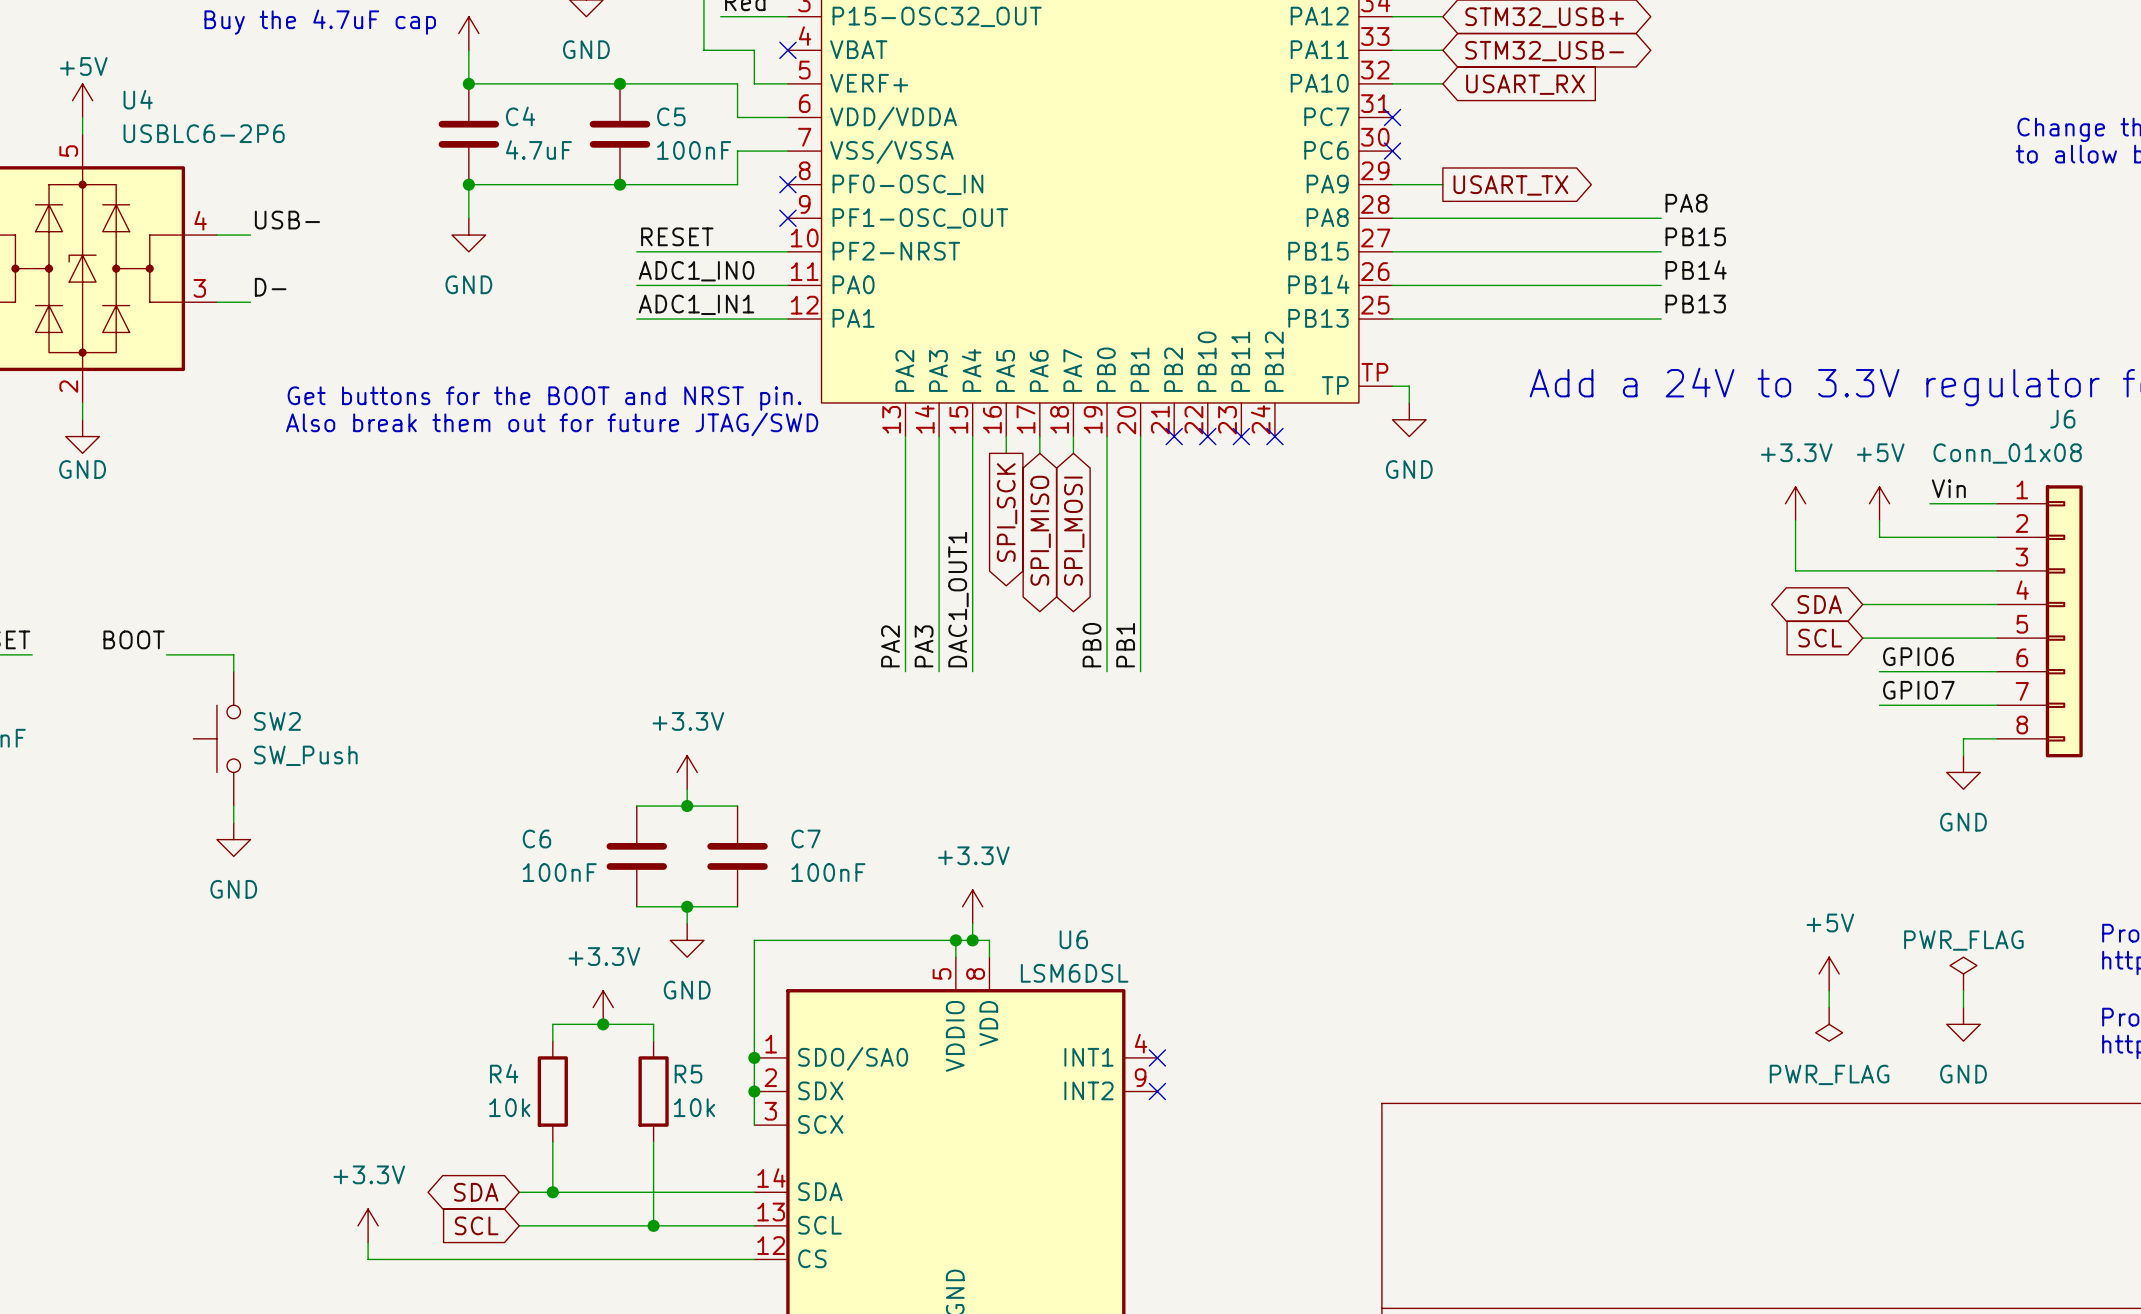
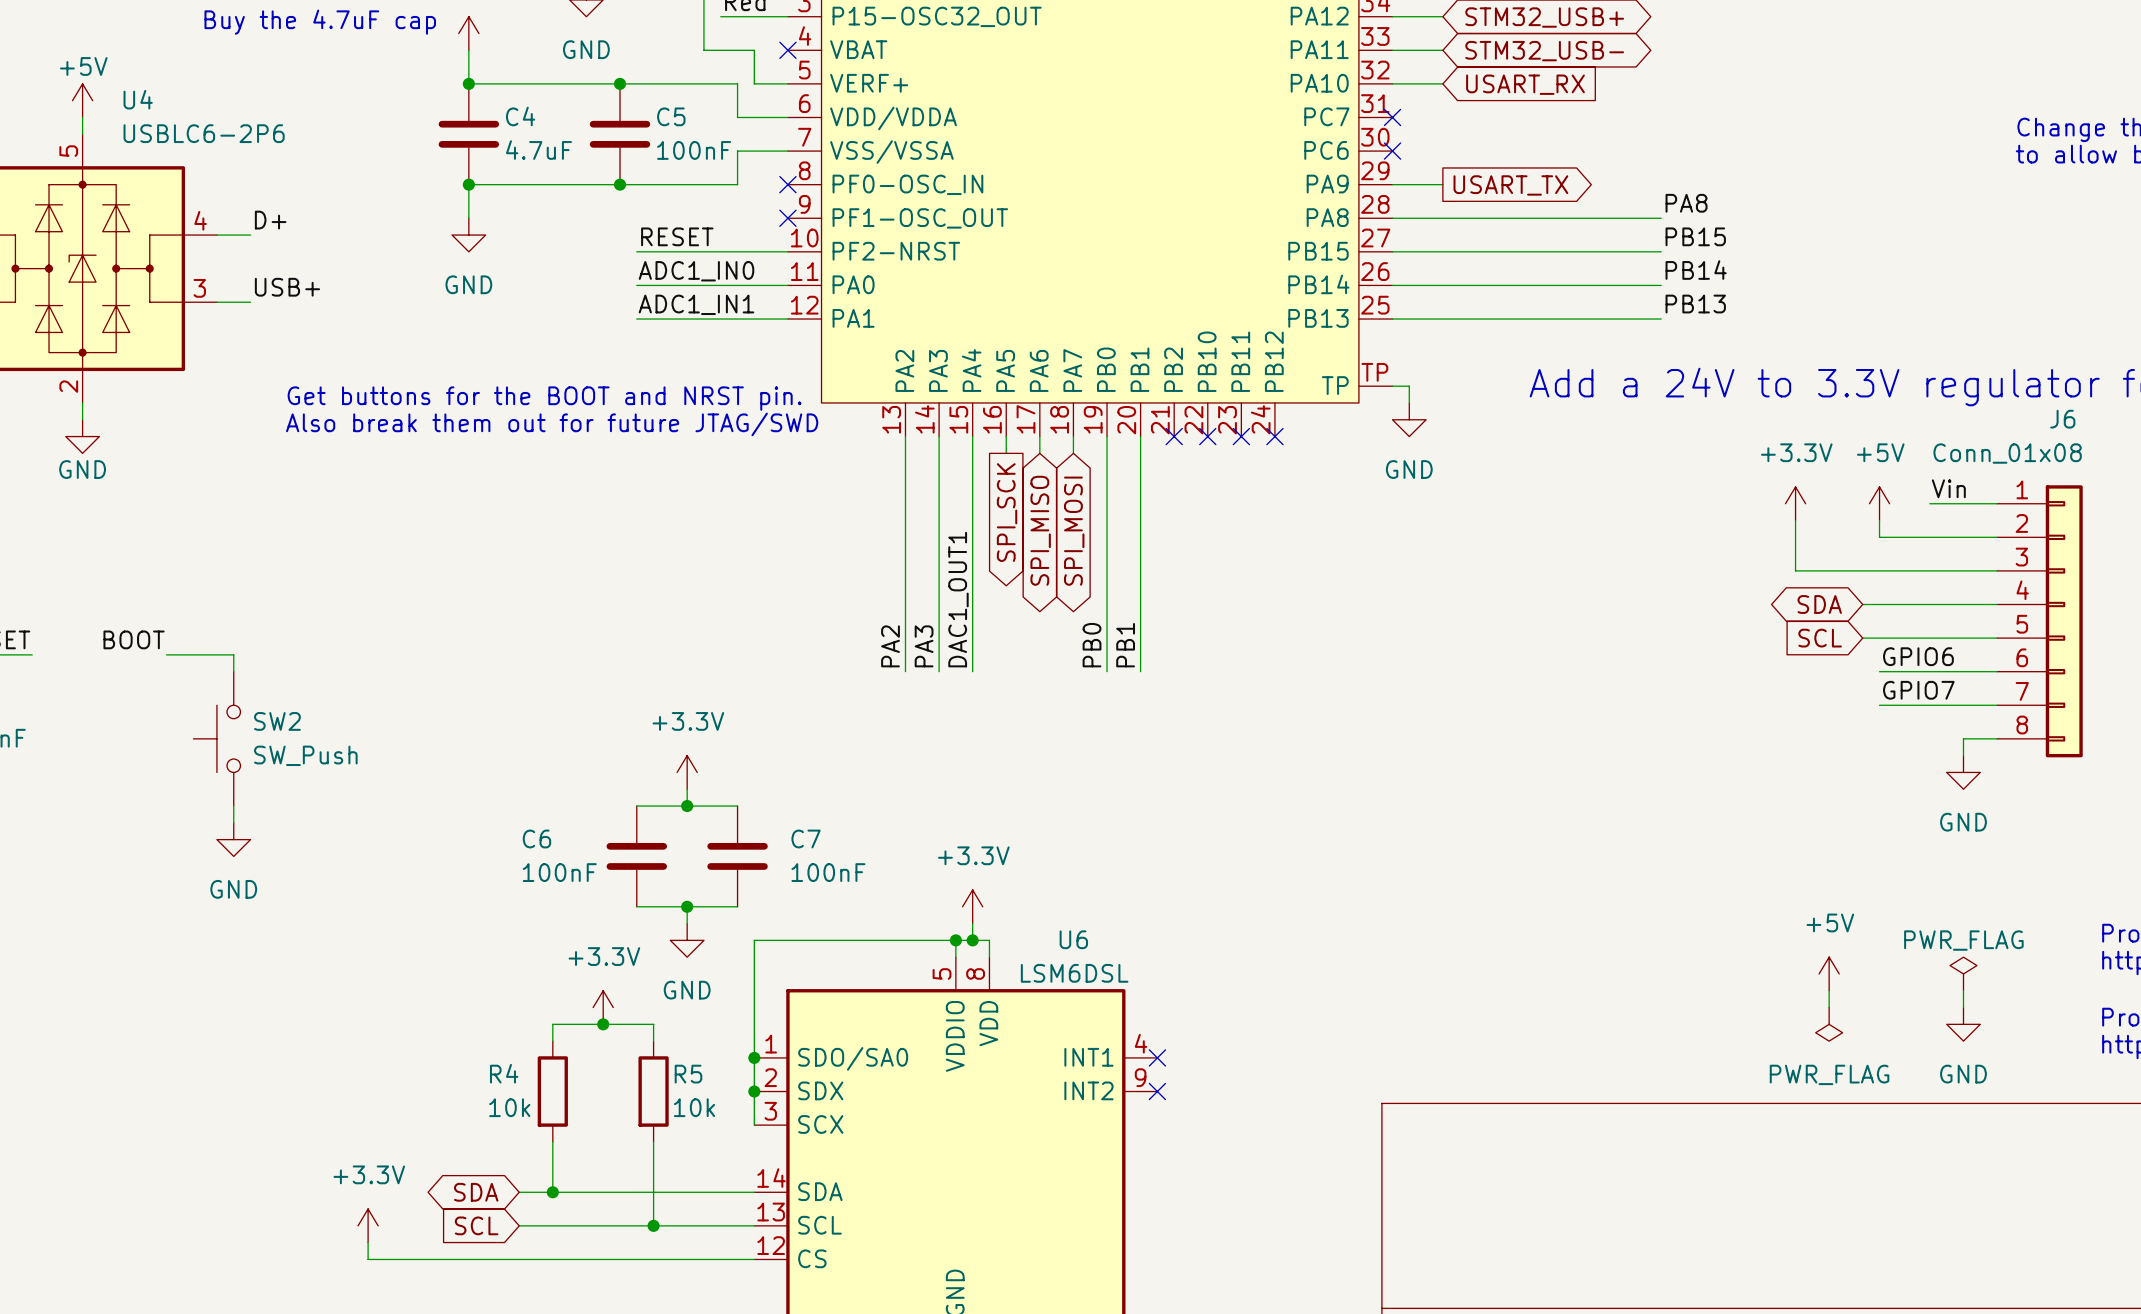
label: USB- (287, 220) -> D+ (270, 220)
label: D- (270, 287) -> USB+ (287, 287)

